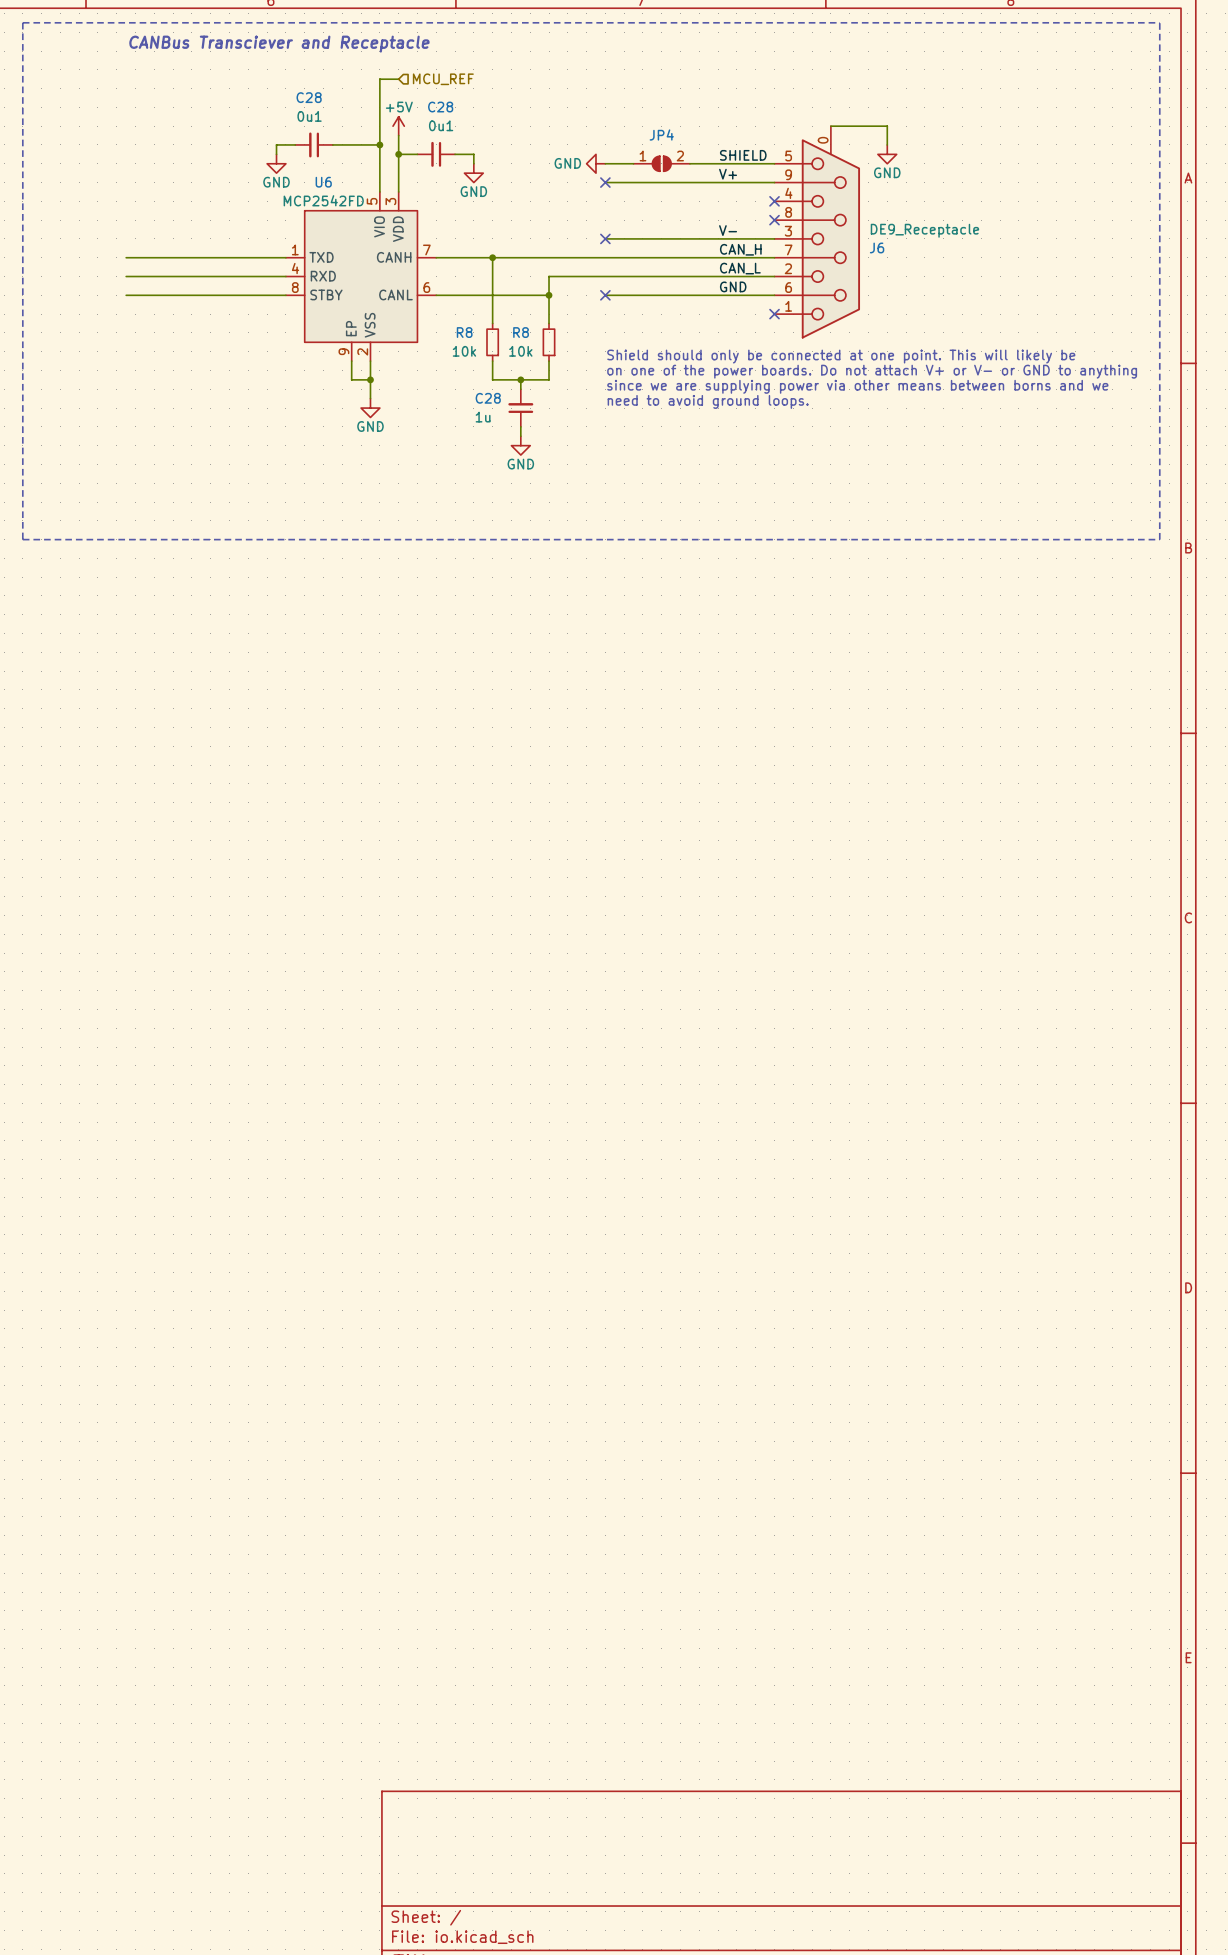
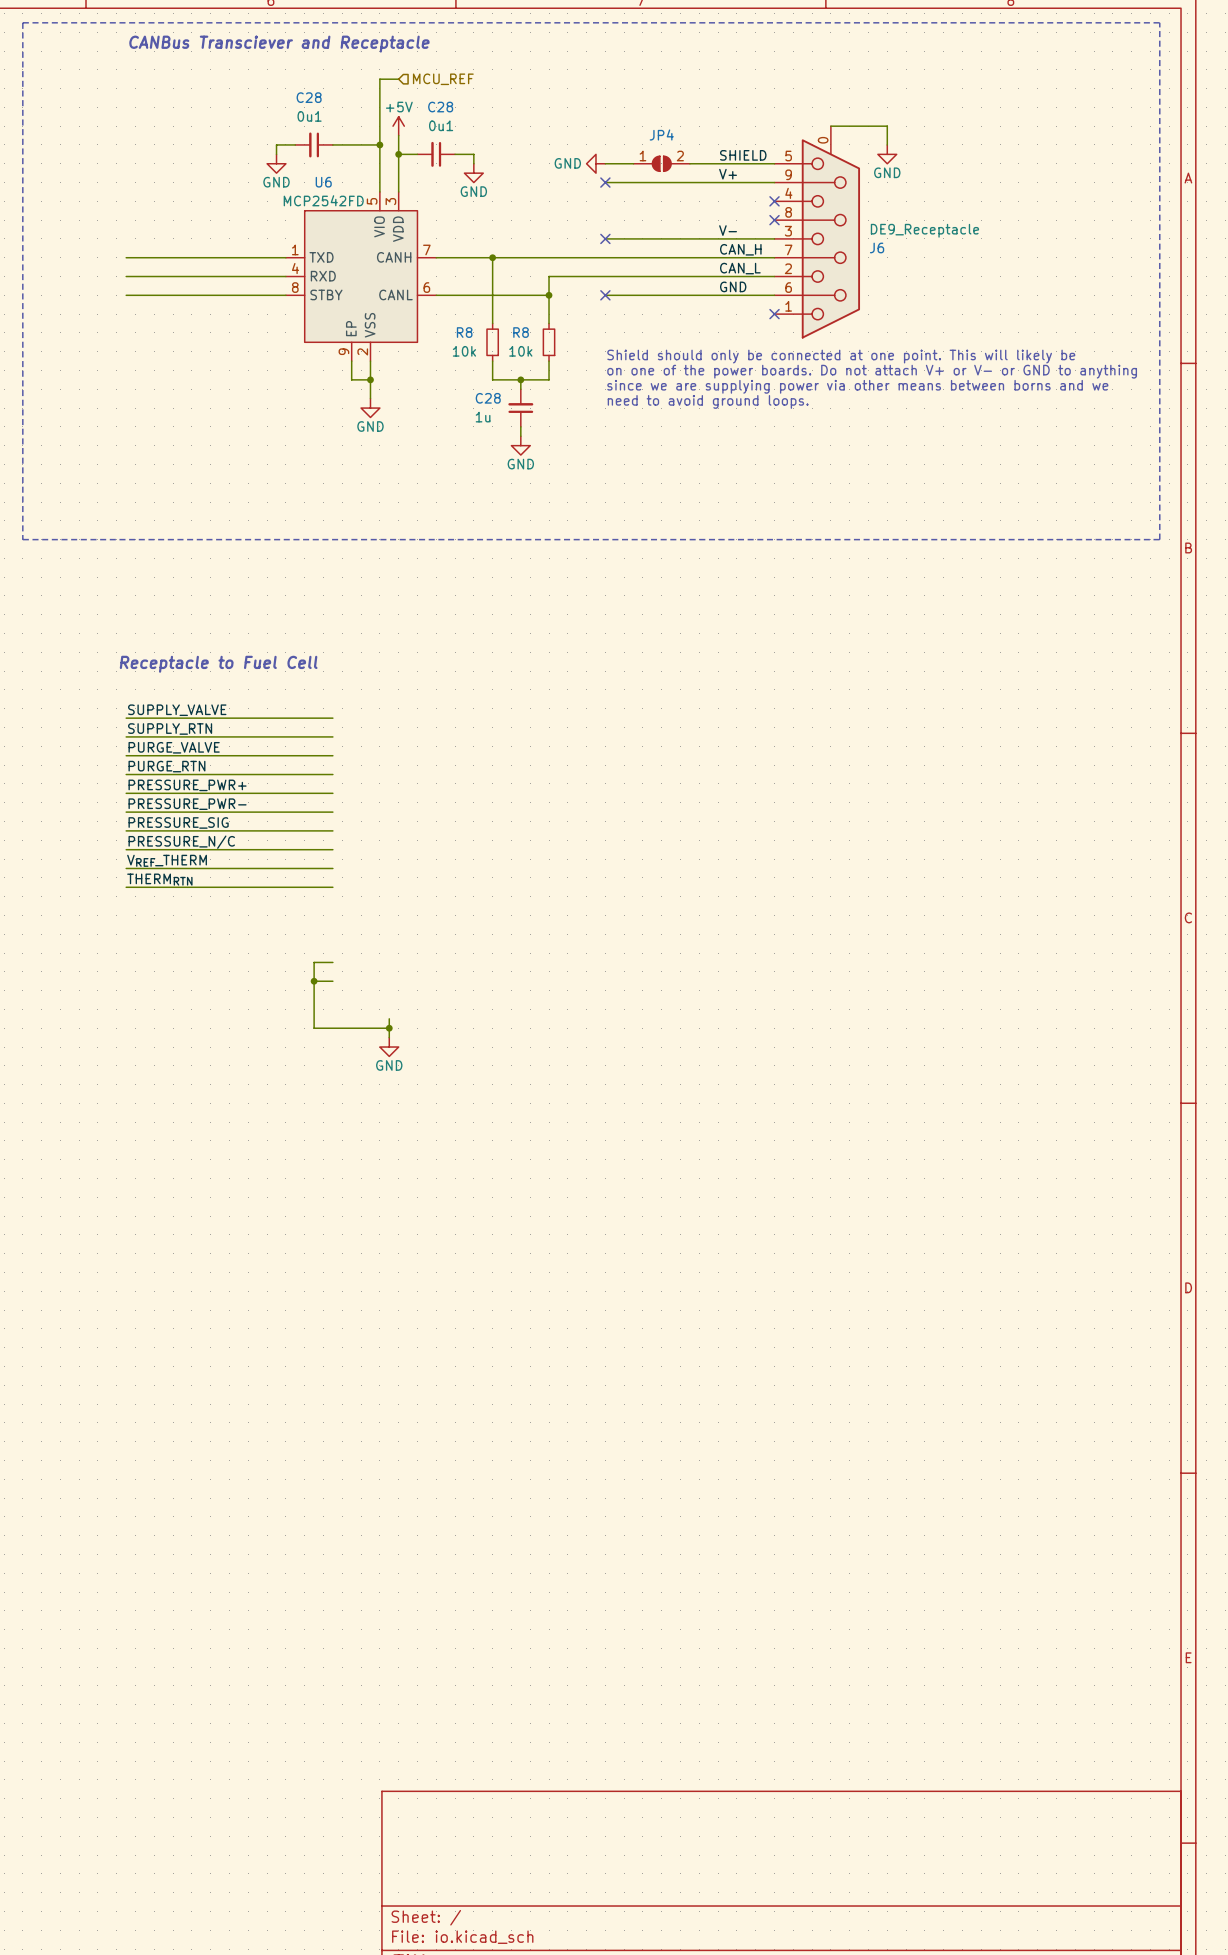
text: none -> Receptacle to Fuel Cell (218, 664)
label: none -> SUPPLY_VALVE (177, 710)
wire: none -> (126, 718) (332, 718)
label: none -> SUPPLY_RTN (170, 729)
wire: none -> (126, 736) (332, 736)
label: none -> PURGE_VALVE (174, 747)
wire: none -> (126, 755) (332, 755)
label: none -> PURGE_RTN (166, 766)
wire: none -> (126, 774) (332, 774)
label: none -> PRESSURE_PWR+ (187, 785)
wire: none -> (126, 793) (332, 793)
label: none -> PRESSURE_PWR- (187, 804)
wire: none -> (126, 812) (332, 812)
label: none -> PRESSURE_SIG (178, 822)
wire: none -> (126, 830) (332, 830)
label: none -> PRESSURE_N/C (181, 842)
wire: none -> (126, 849) (332, 849)
label: none -> VREF_THERM (167, 860)
wire: none -> (126, 868) (332, 868)
label: none -> THERMRTN (159, 879)
wire: none -> (126, 887) (332, 887)
wire: none -> (332, 962) (314, 962) (314, 1028) (389, 1028)
wire: none -> (314, 981) (332, 981)
junction: none -> (314, 981)
wire: none -> (389, 1018) (389, 1037)
junction: none -> (389, 1028)
power symbol: none -> GND (389, 1047)

